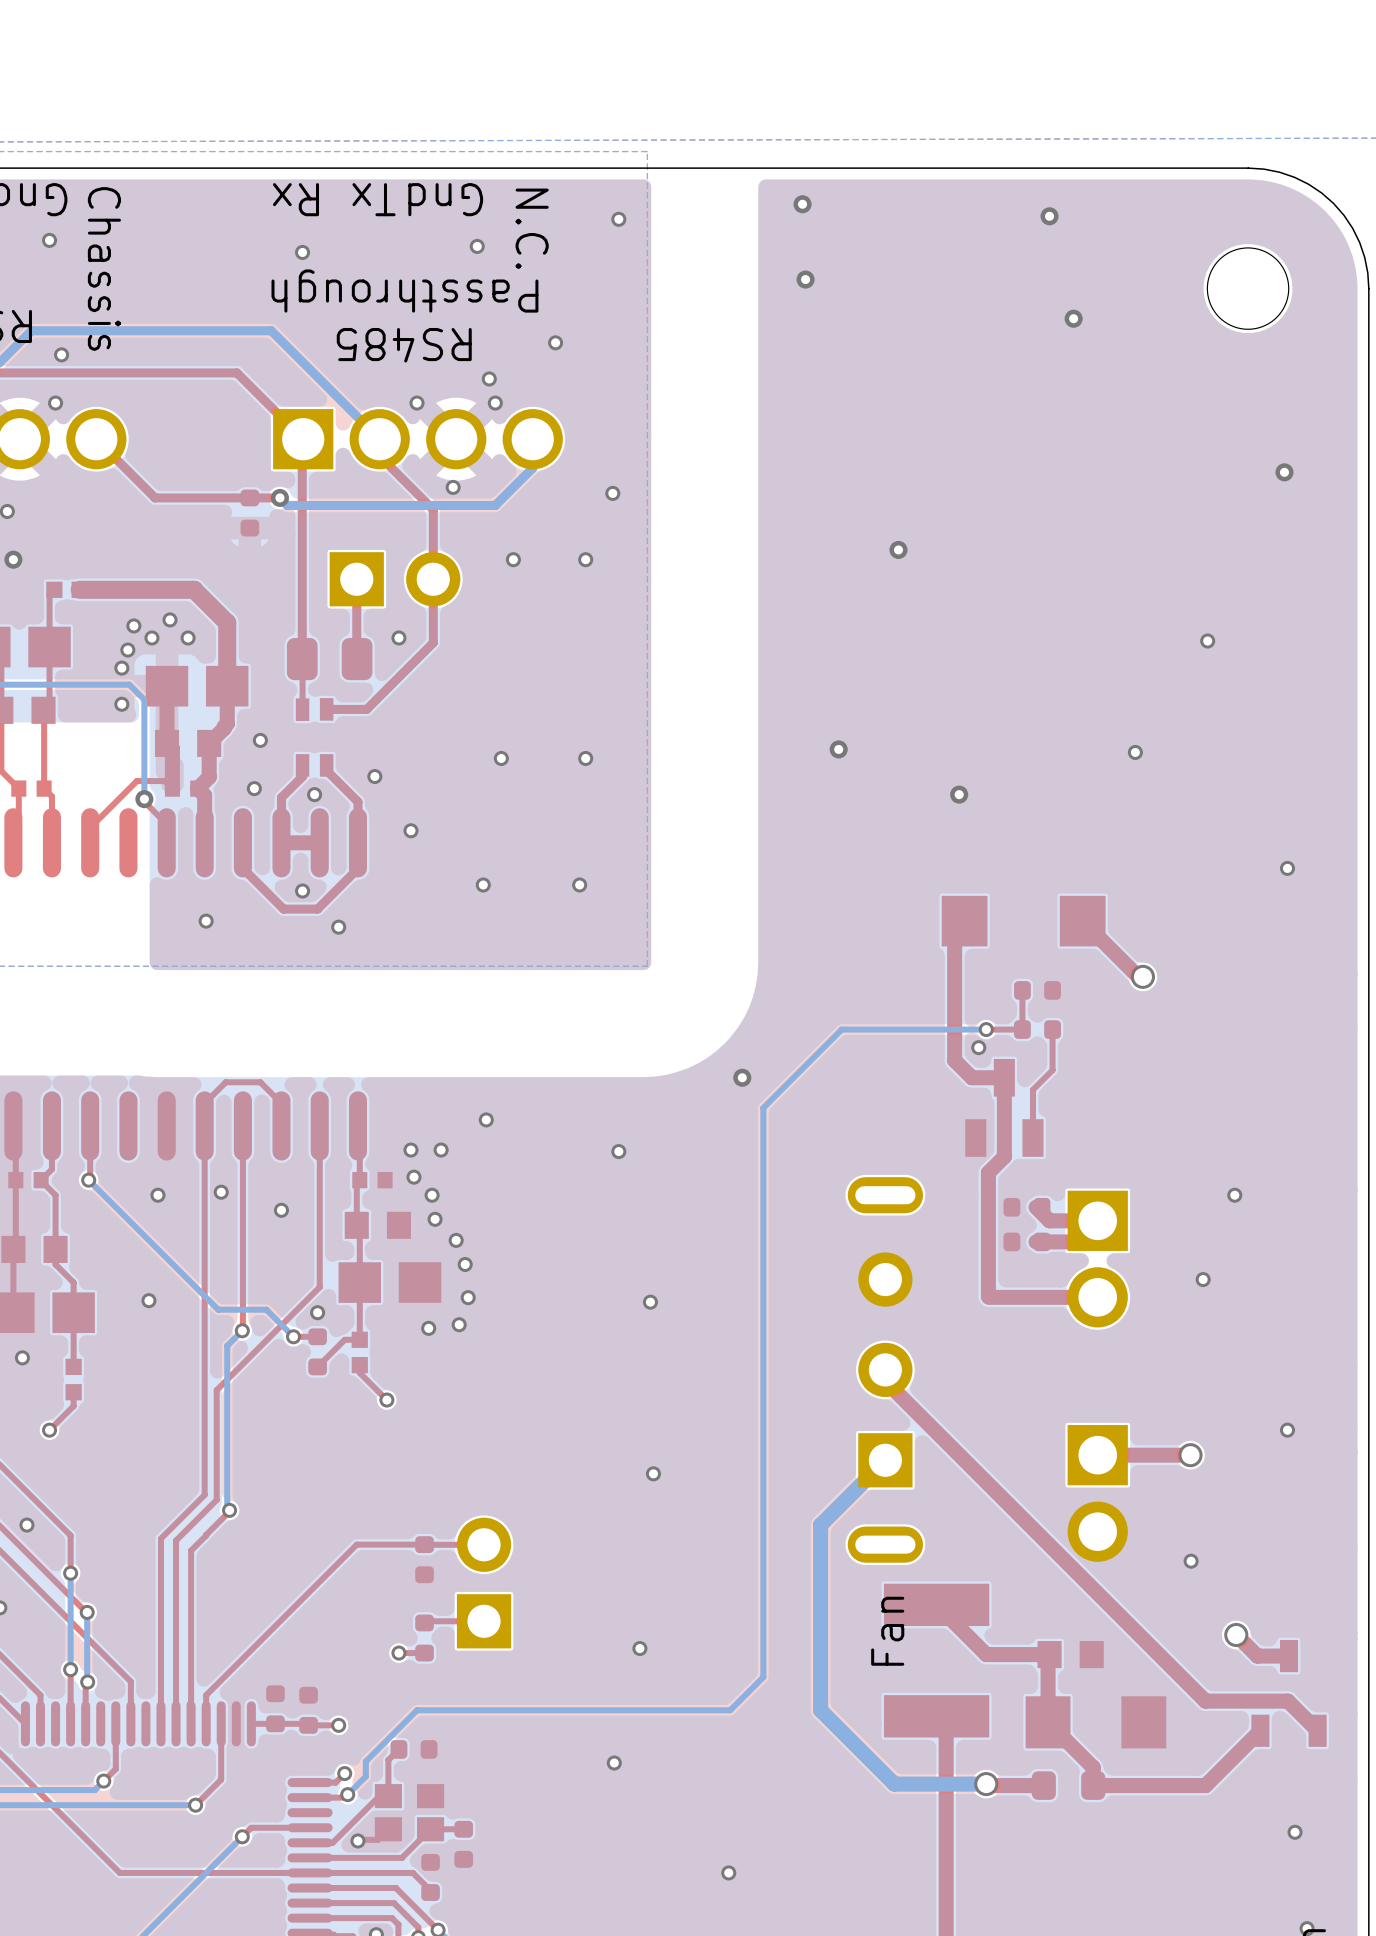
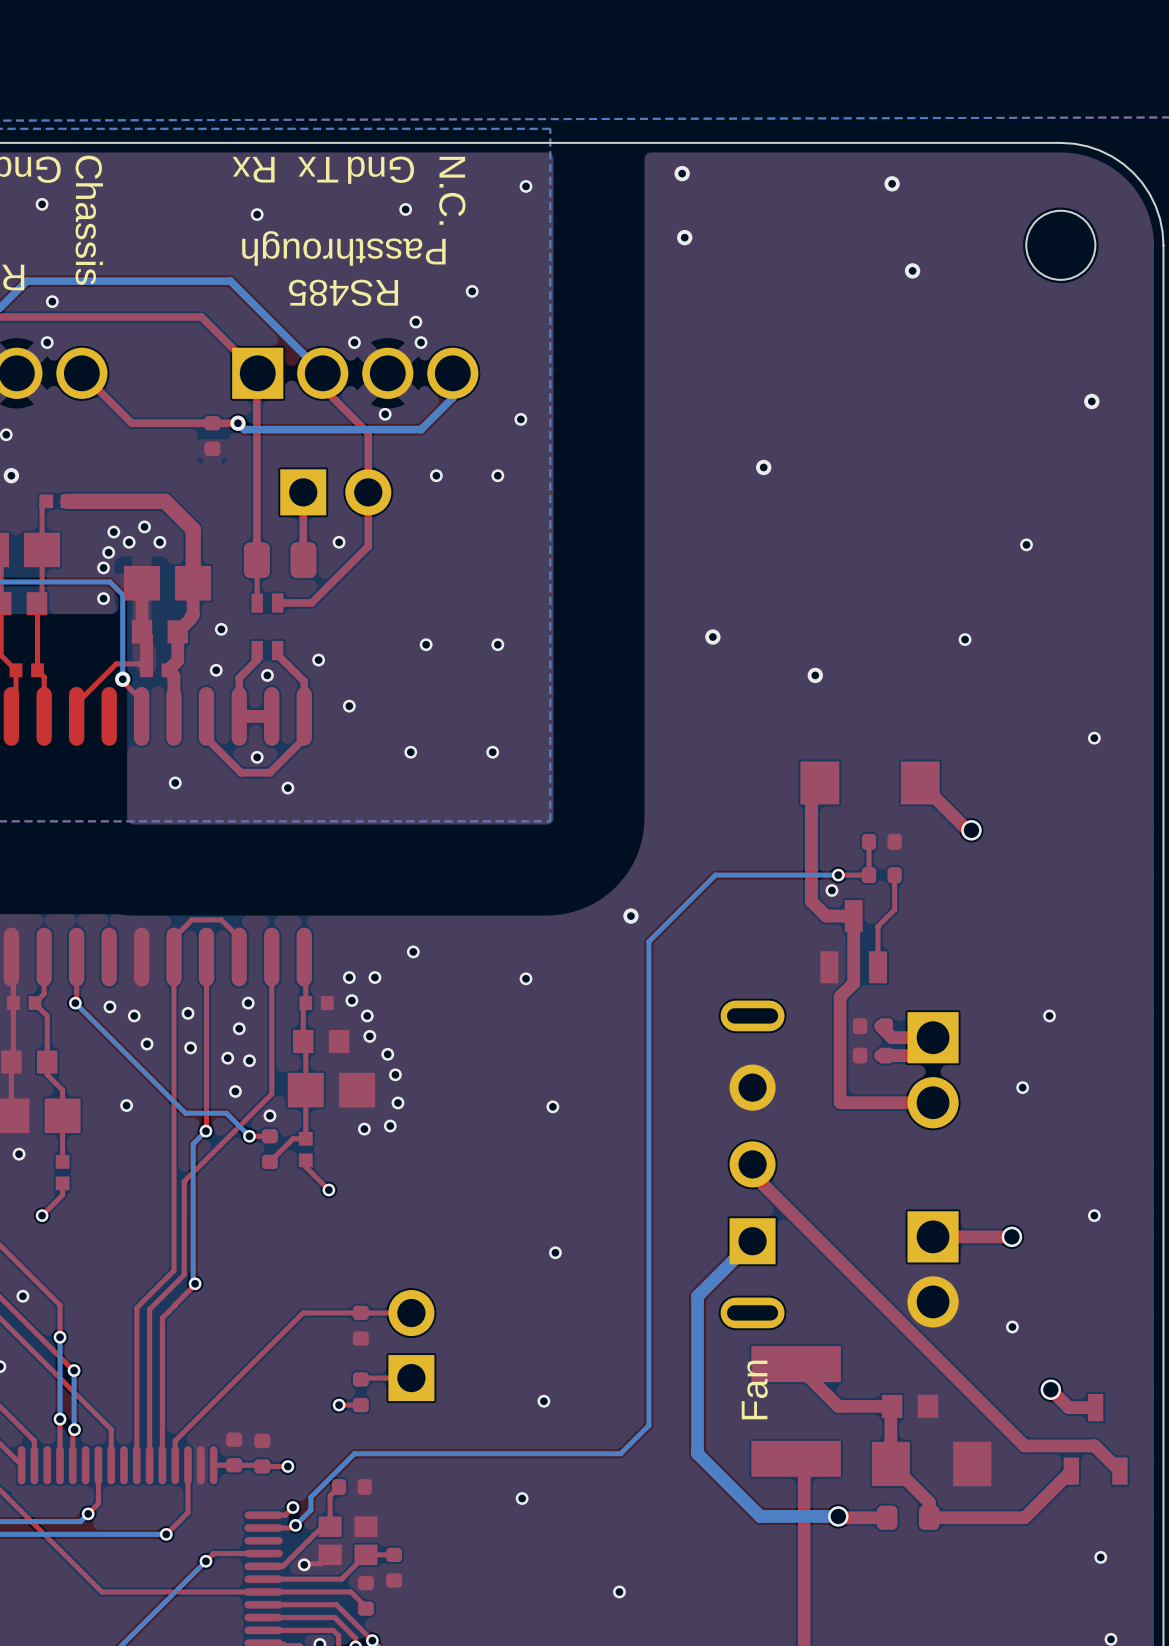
via: none -> (248, 1003)
via: none -> (109, 1006)
via: none -> (147, 1044)
via: none -> (190, 1047)
via: none -> (227, 1058)
via: none -> (249, 1060)
via: none -> (235, 1091)

